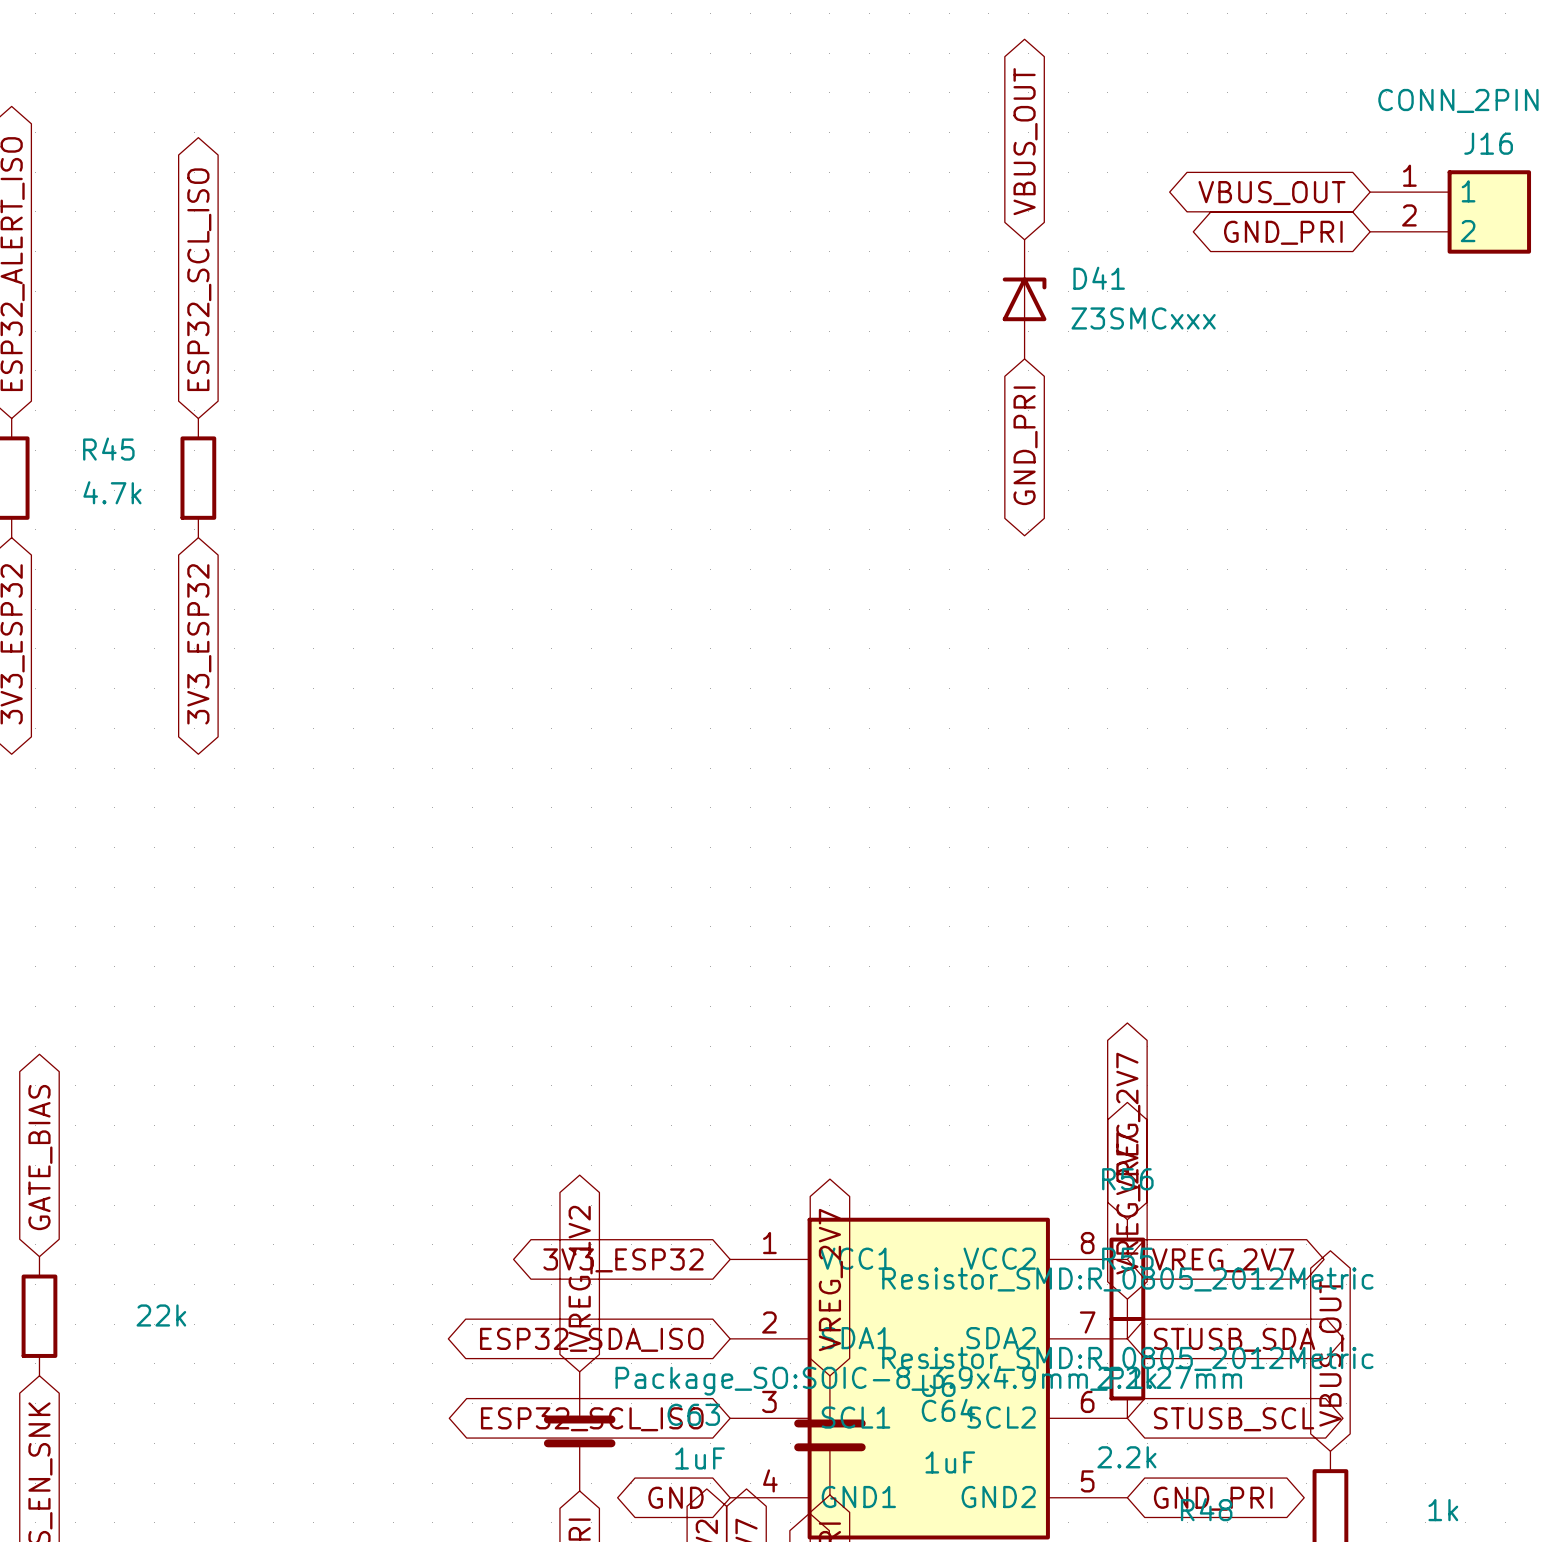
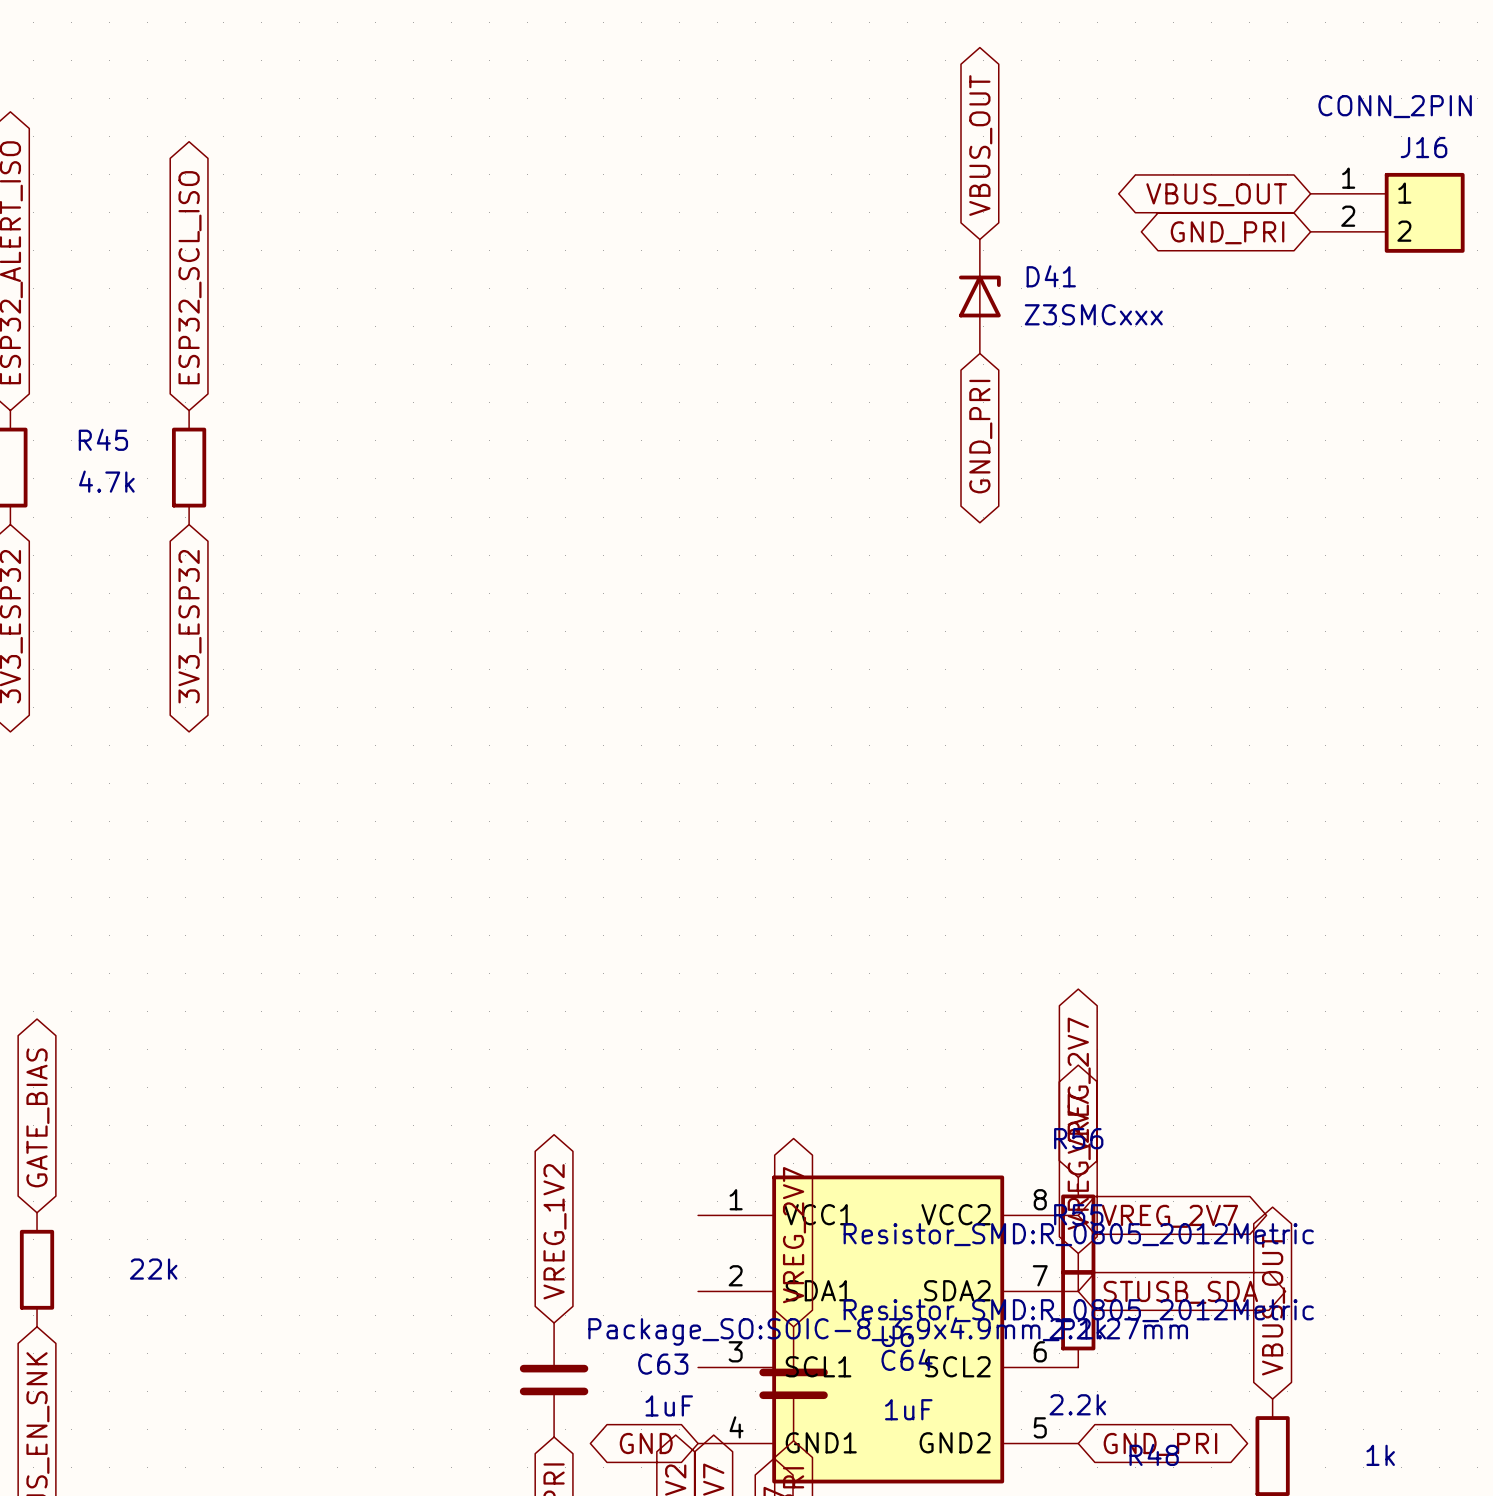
global label: 3V3_ESP32 (623, 1260) -> none
global label: ESP32_SDA_ISO (591, 1339) -> none
global label: ESP32_SCL_ISO (592, 1419) -> none
global label: STUSB_SCL (1234, 1419) -> none

